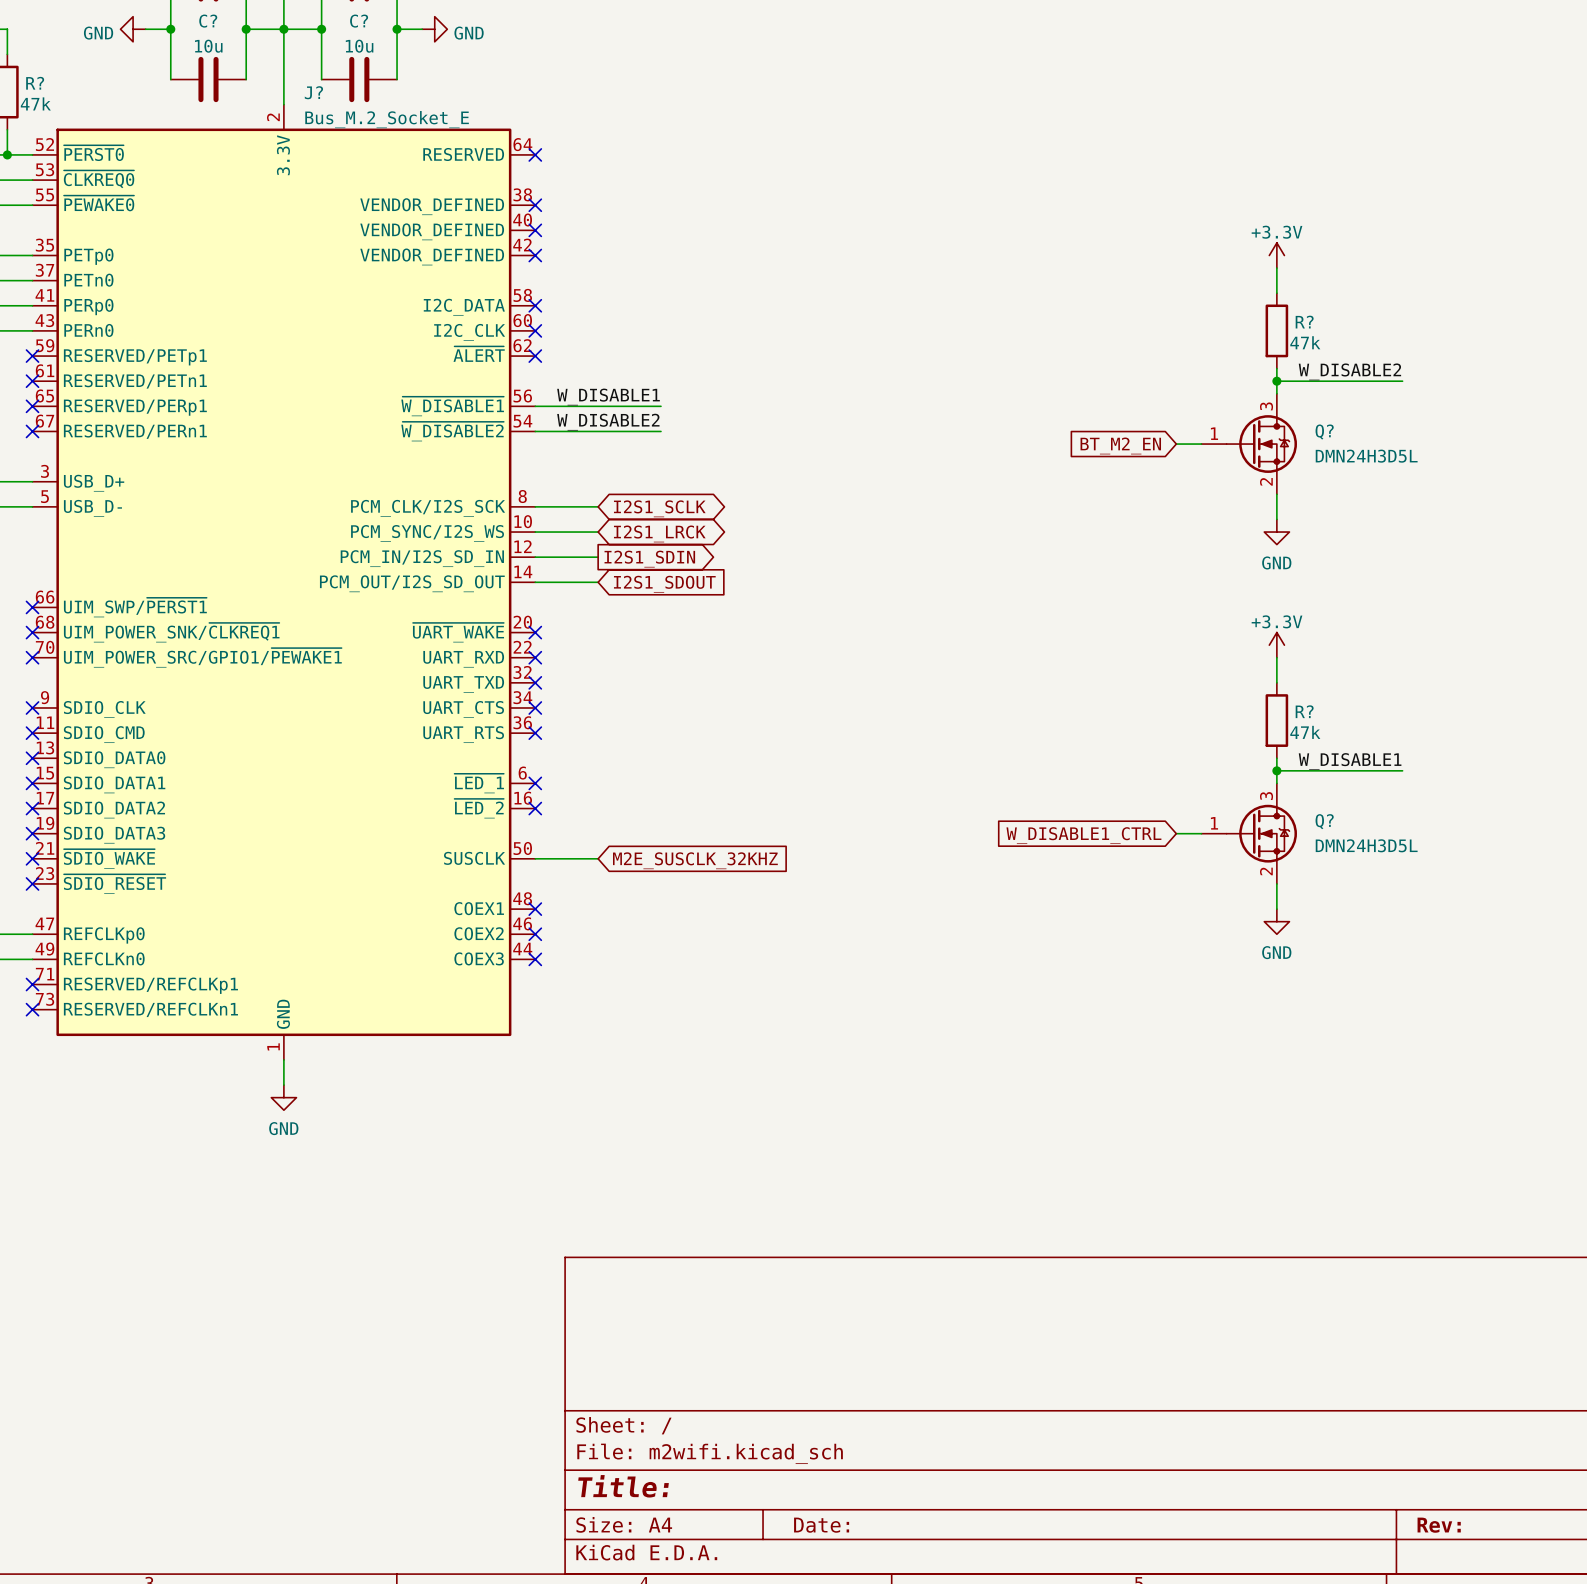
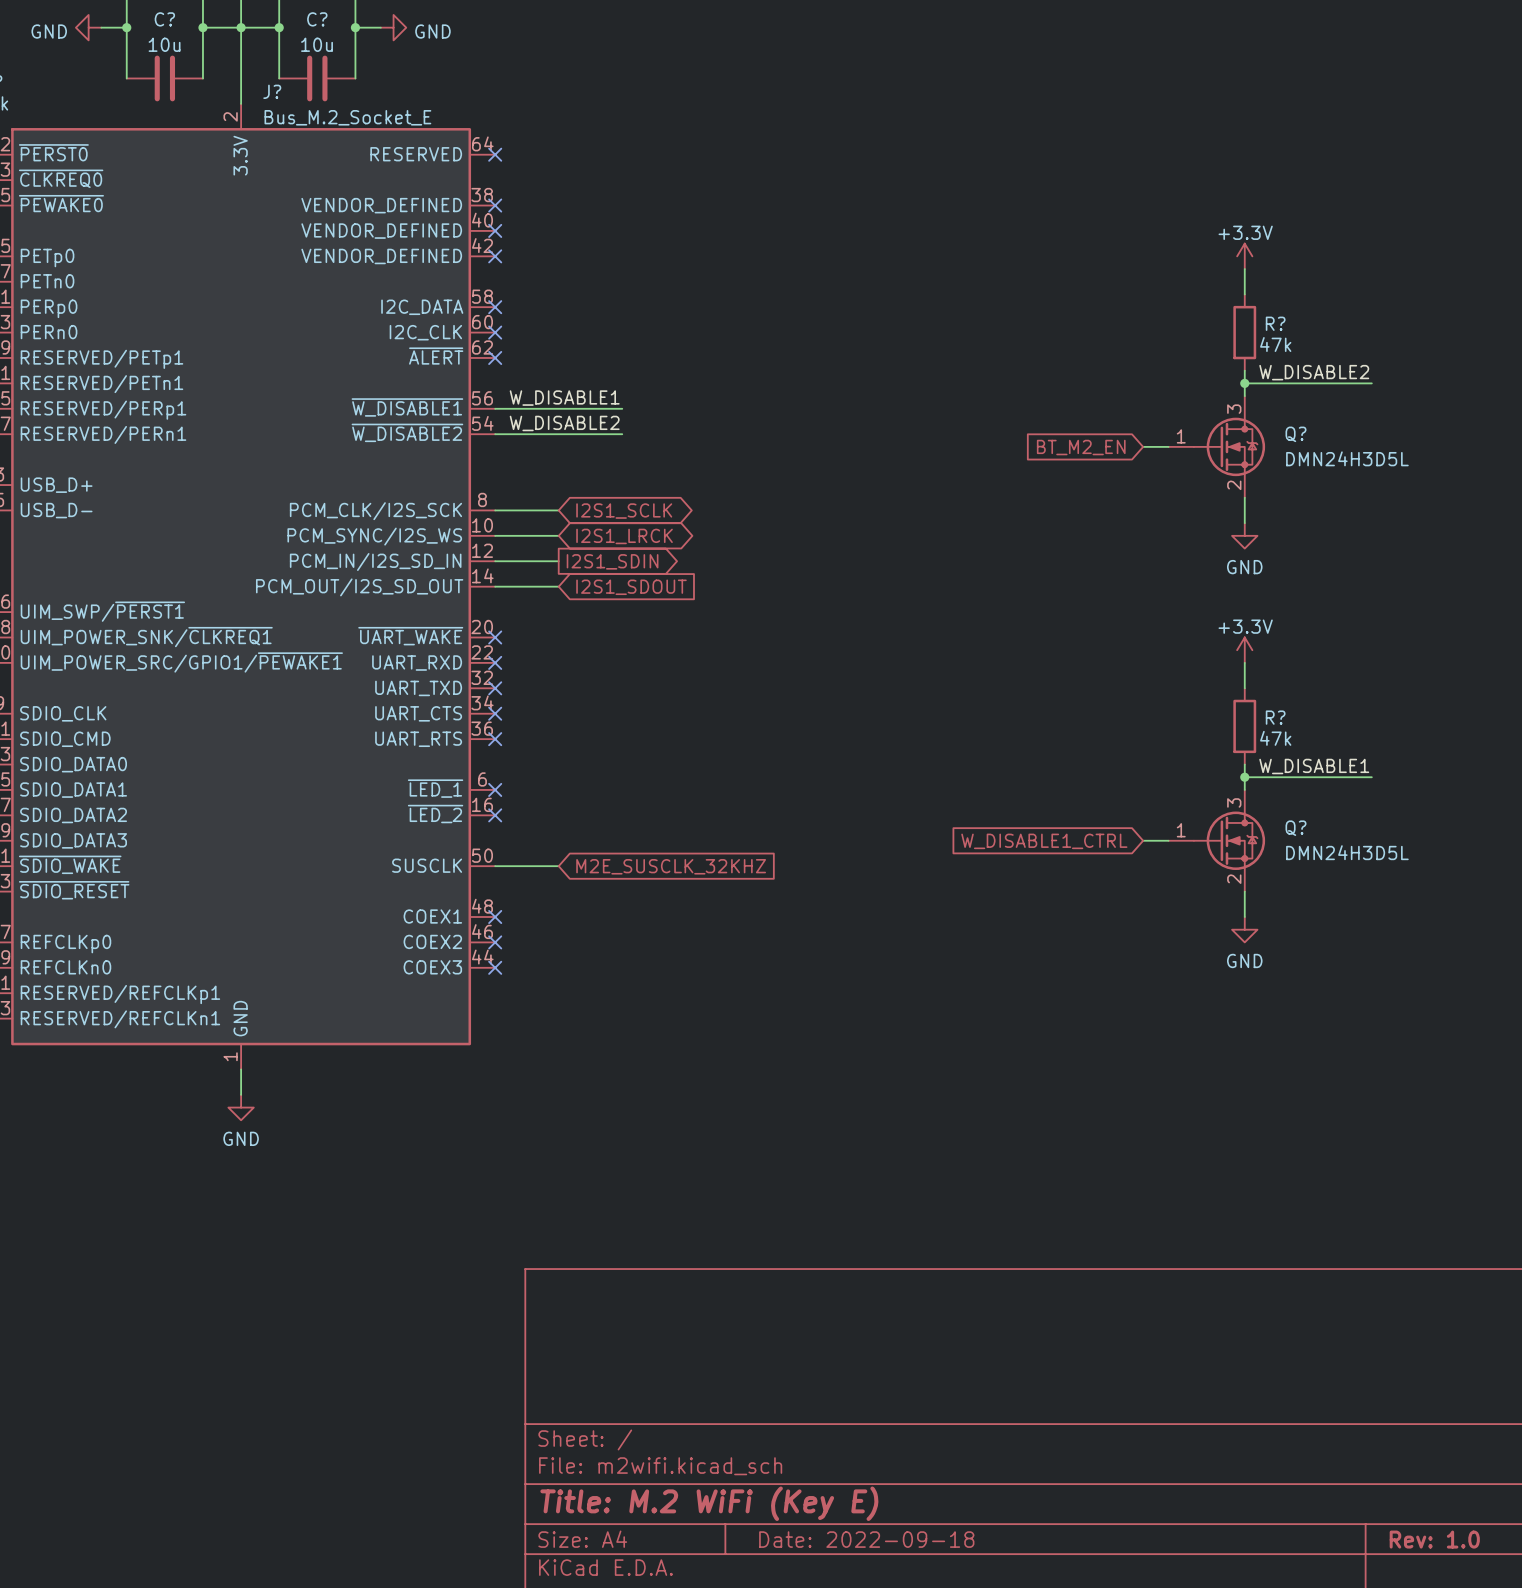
title block: Title: (623, 1486) -> Title: M.2 WiFi (Key E) (709, 1503)
title block: Date: (821, 1525) -> Date: 2022-09-18 (866, 1539)
title block: Rev: (1439, 1525) -> Rev: 1.0 (1434, 1539)

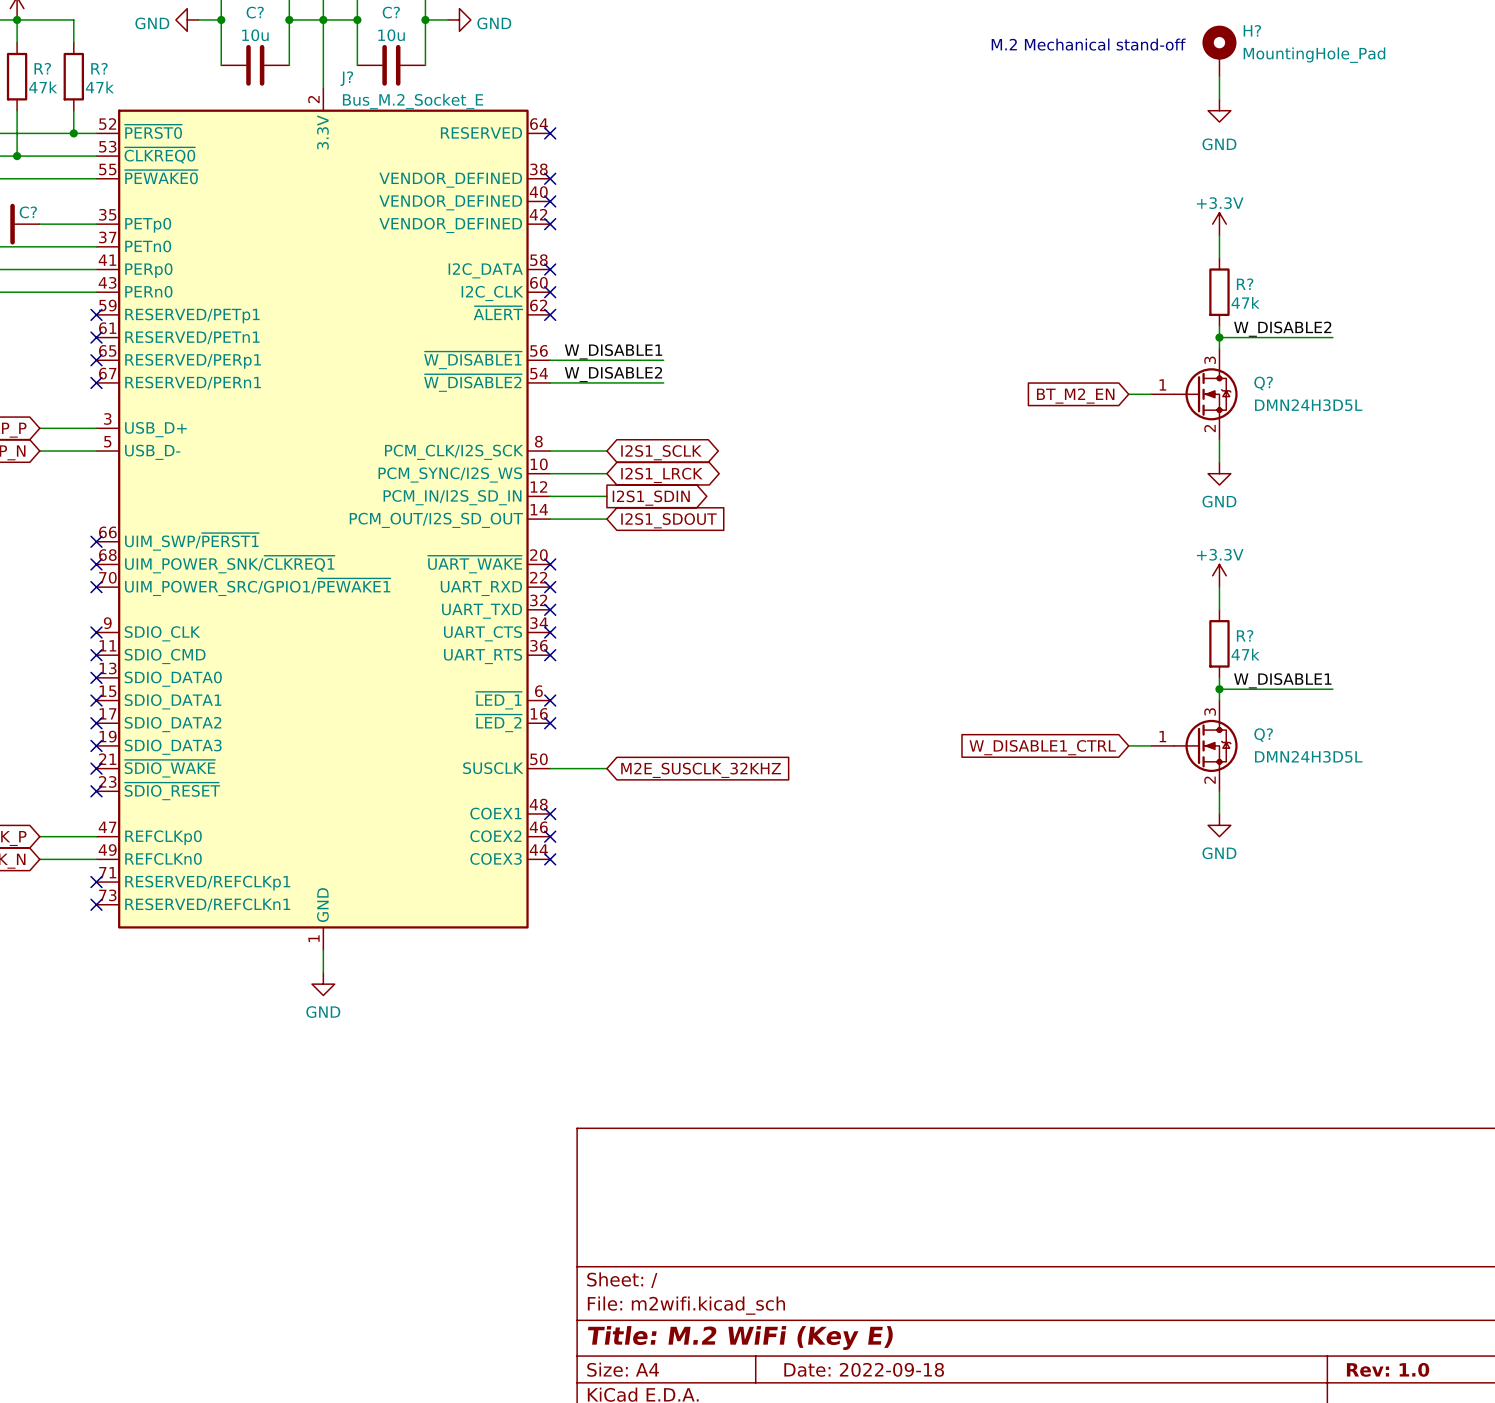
text: none -> M.2 Mechanical stand-off (1088, 44)
H?: none -> MountingHole_Pad (1219, 51)
wire: none -> (1219, 76) (1219, 99)
power symbol: none -> GND (1219, 110)

